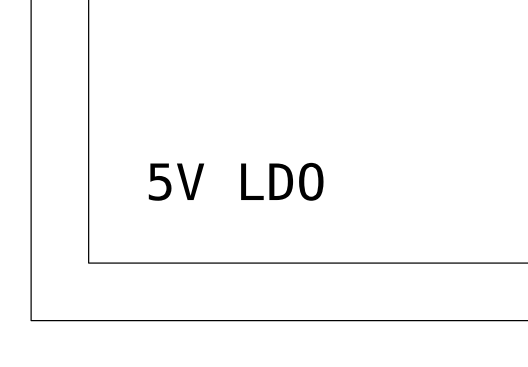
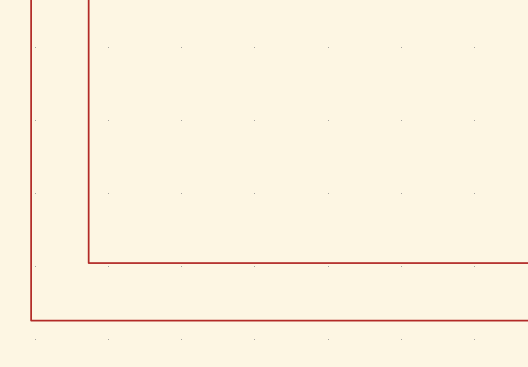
text: 5V LDO (236, 181) -> none

